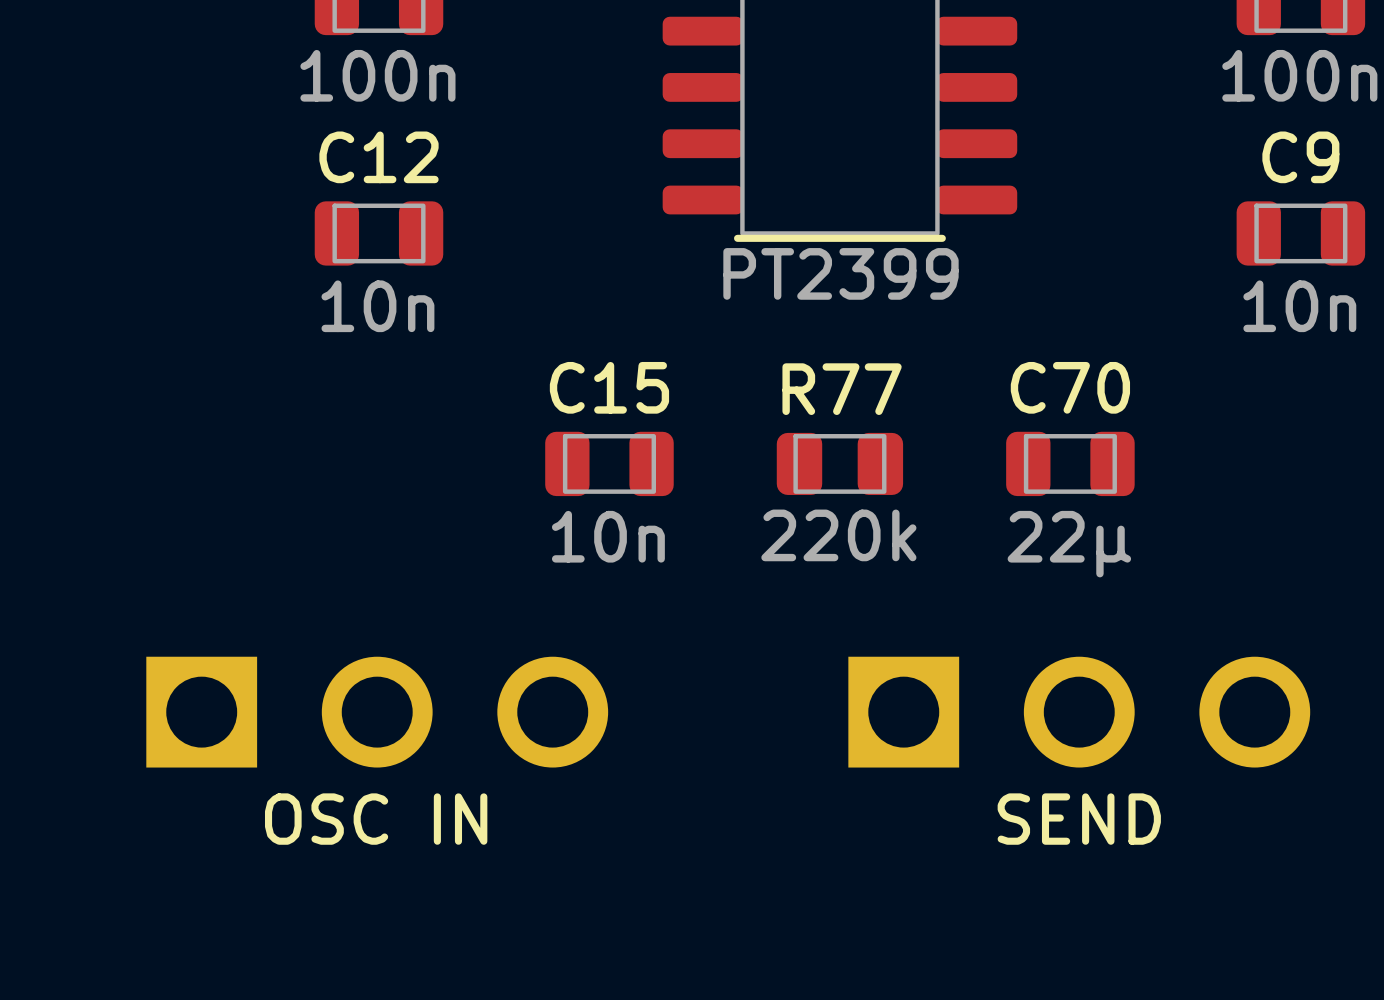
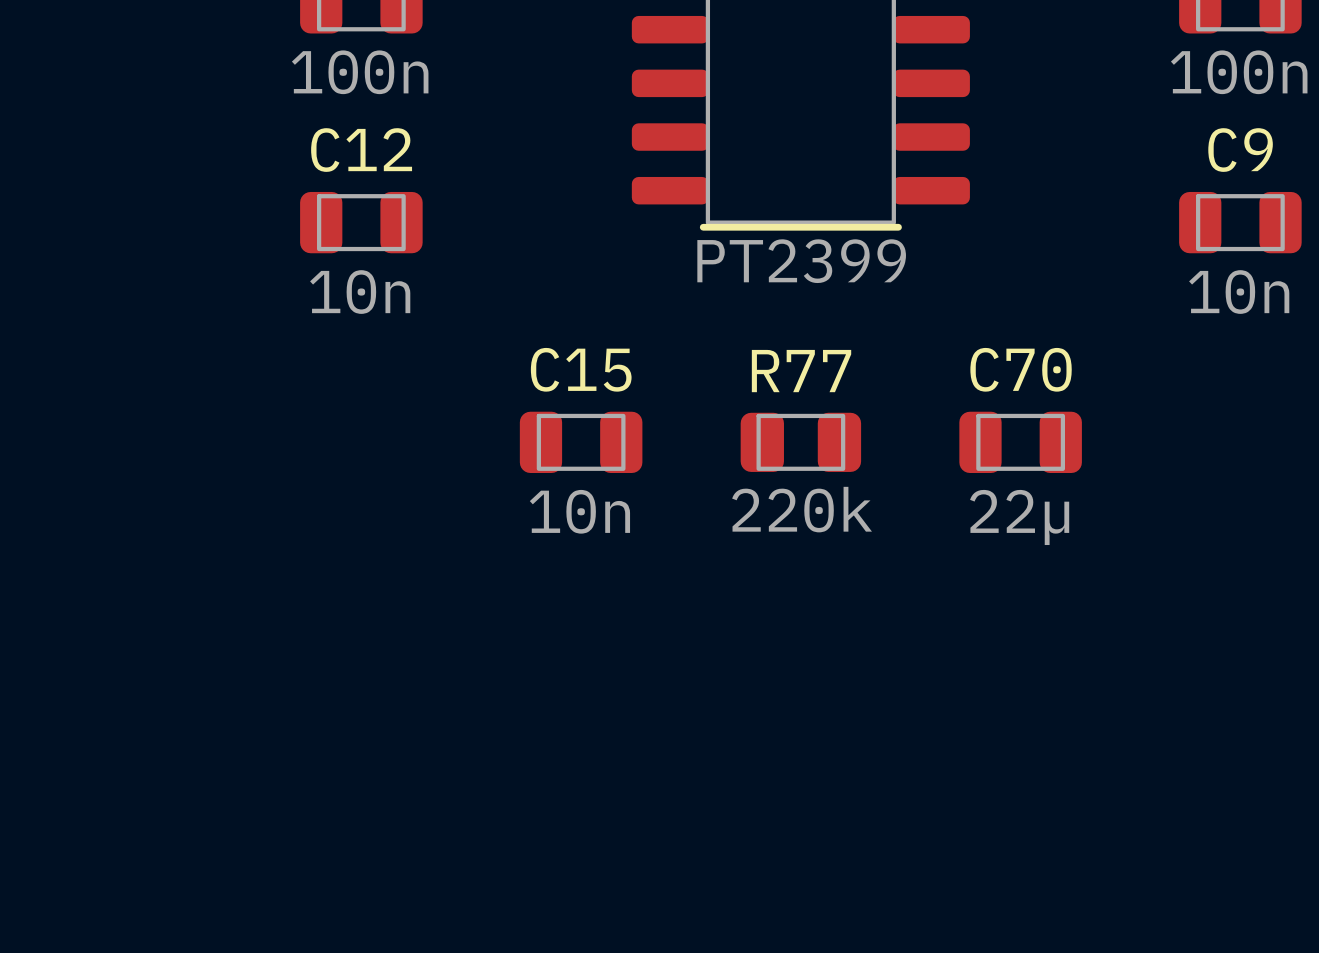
part: OSC IN (377, 712) -> none
part: SEND (1079, 712) -> none

